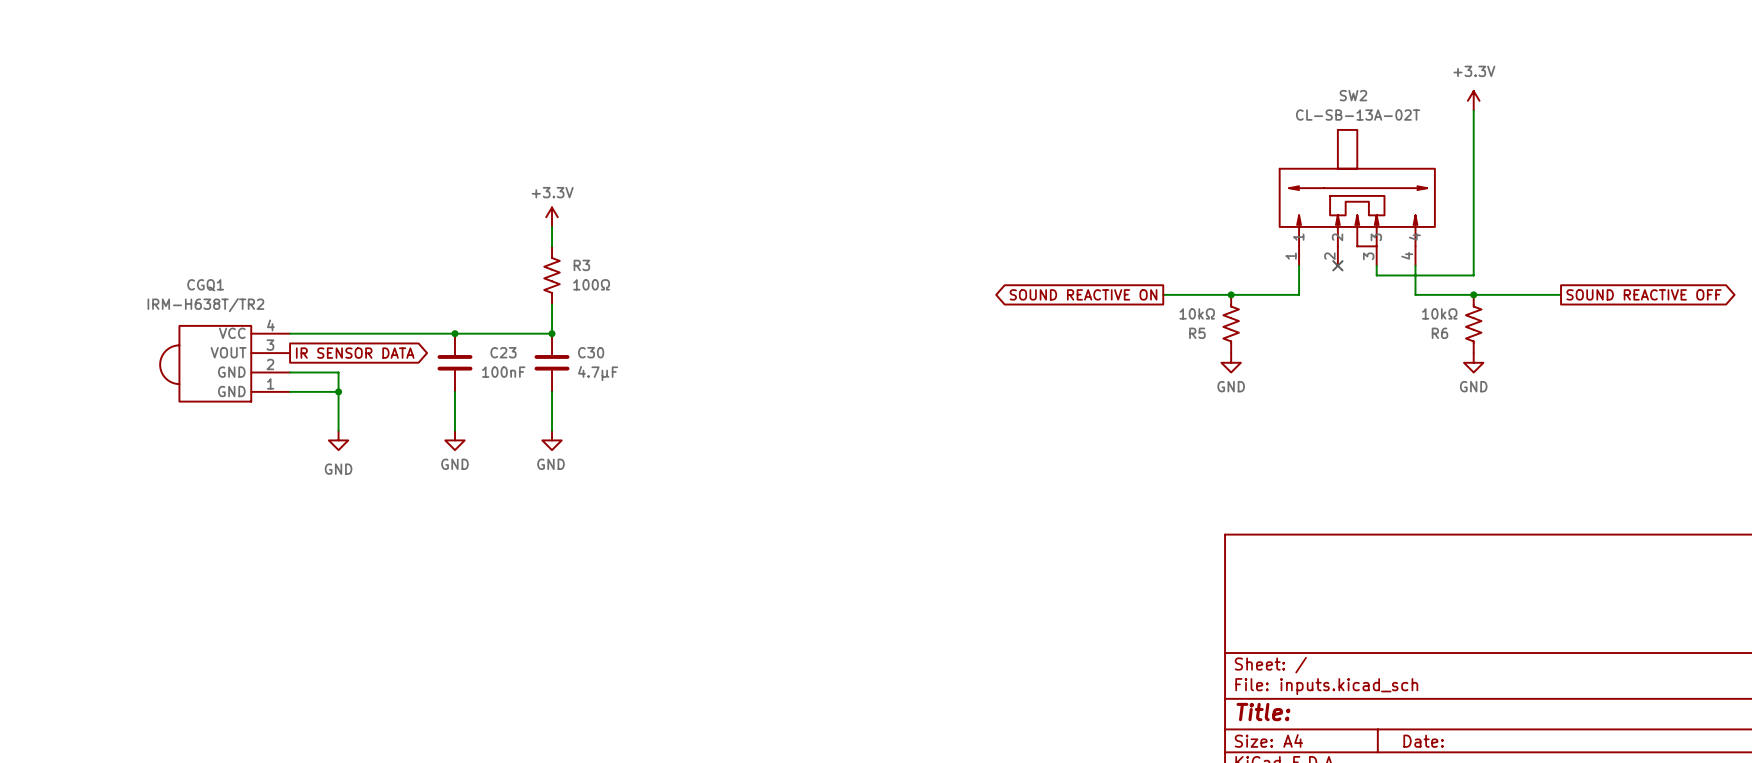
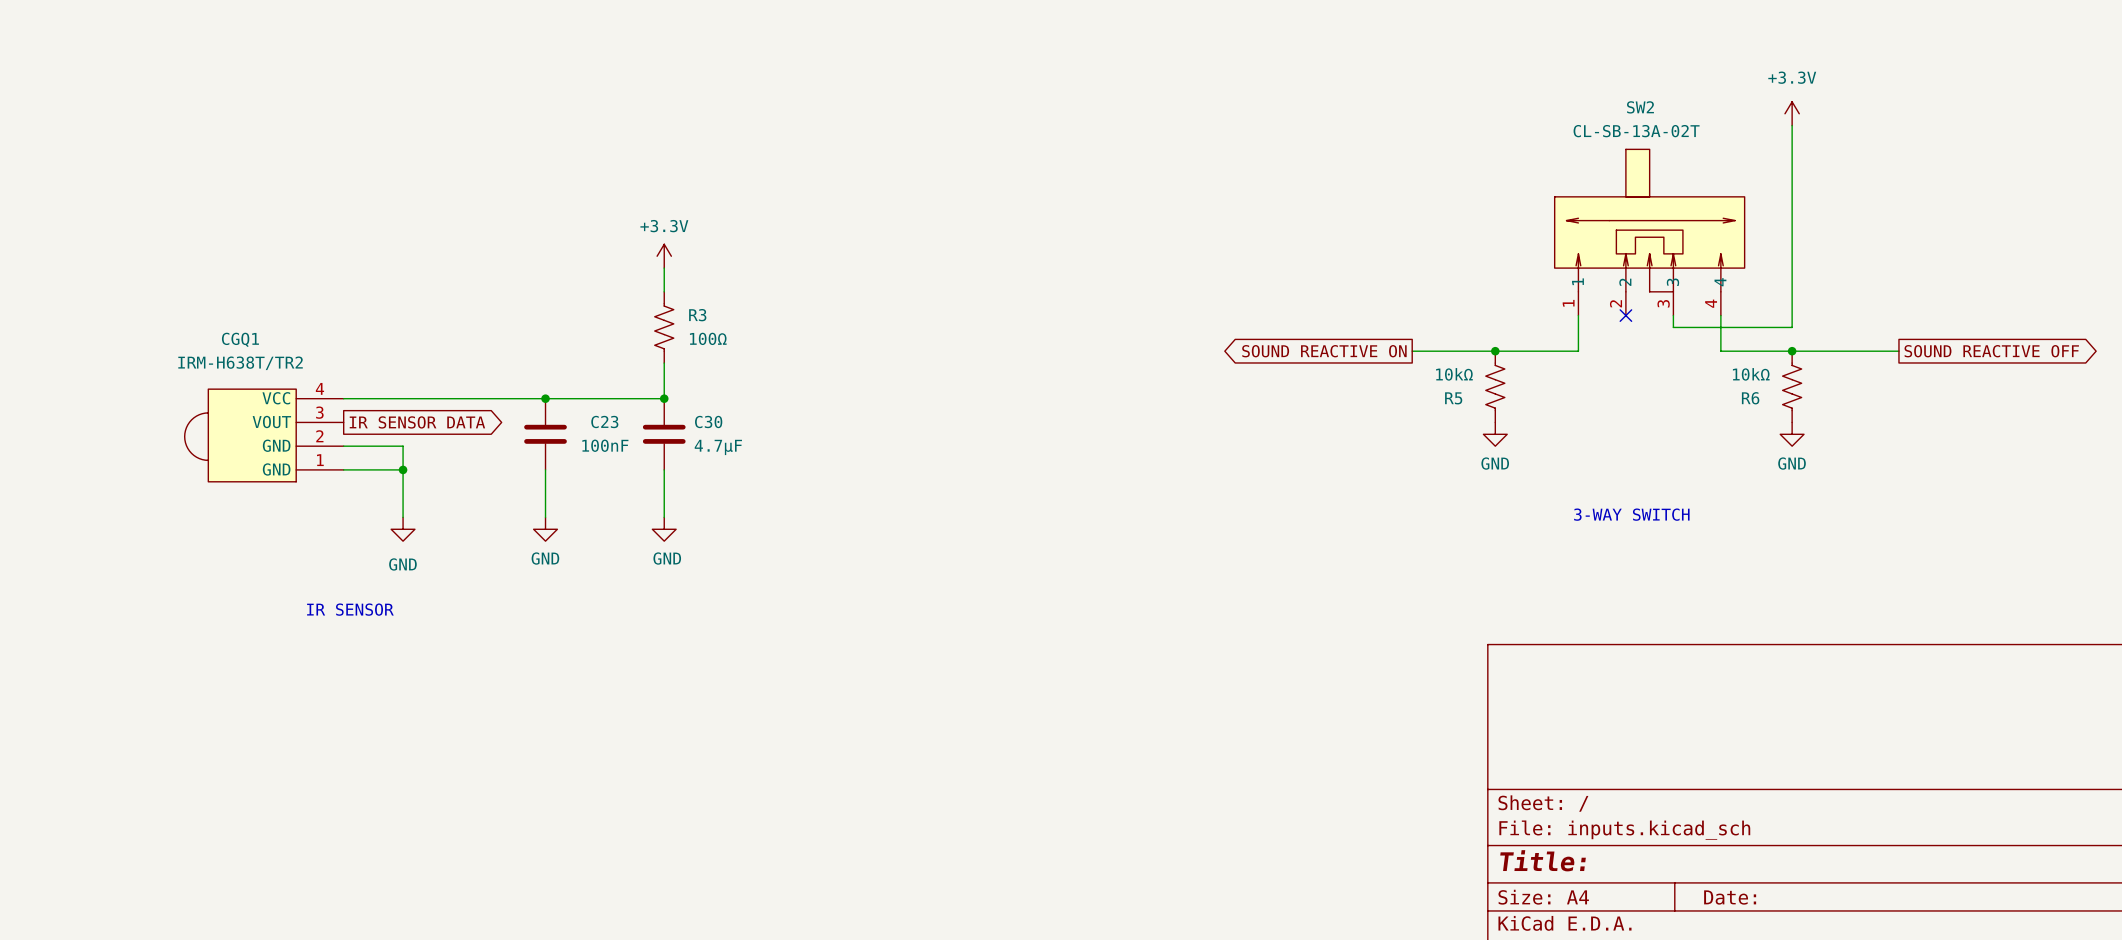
text: none -> 3-WAY SWITCH (1631, 514)
text: none -> IR SENSOR (350, 609)

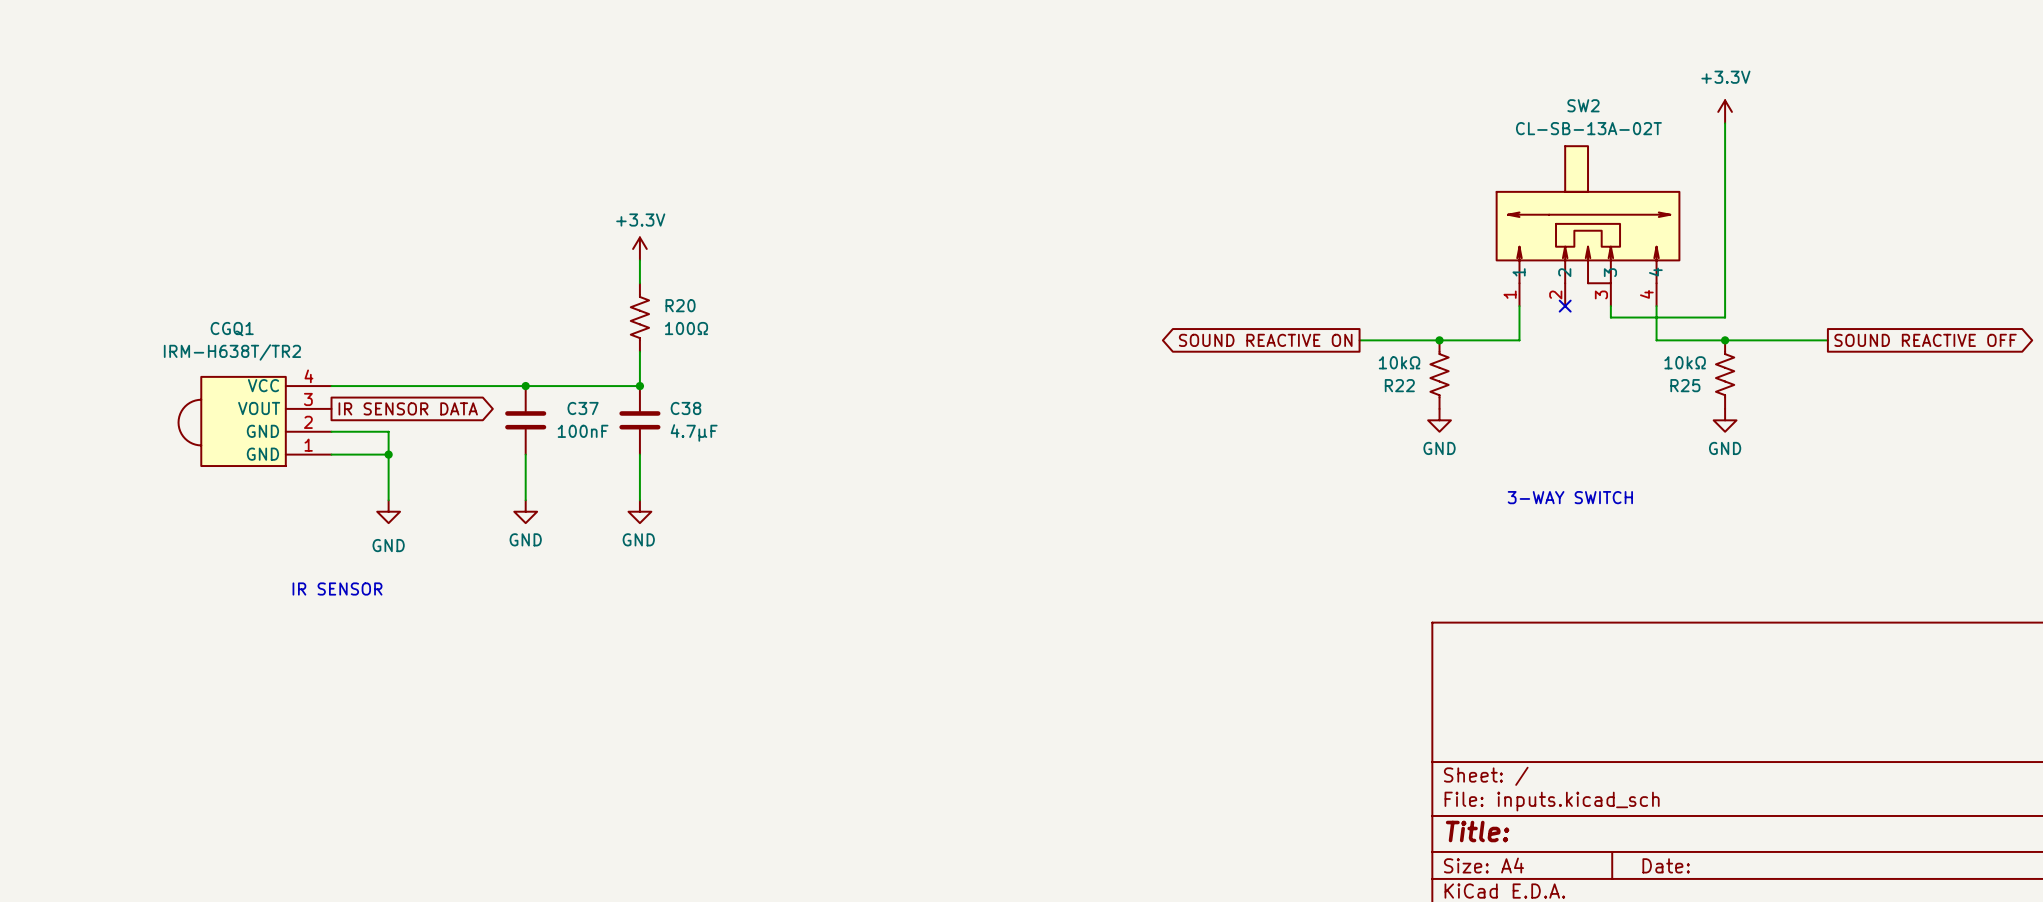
R3 name: R3 (697, 315) -> R20 (680, 305)
R5 name: R5 (1453, 398) -> R22 (1399, 385)
R6 name: R6 (1750, 398) -> R25 (1685, 385)
C30 name: C30 (708, 421) -> C38 (685, 408)
C23 name: C23 (604, 422) -> C37 (583, 408)

